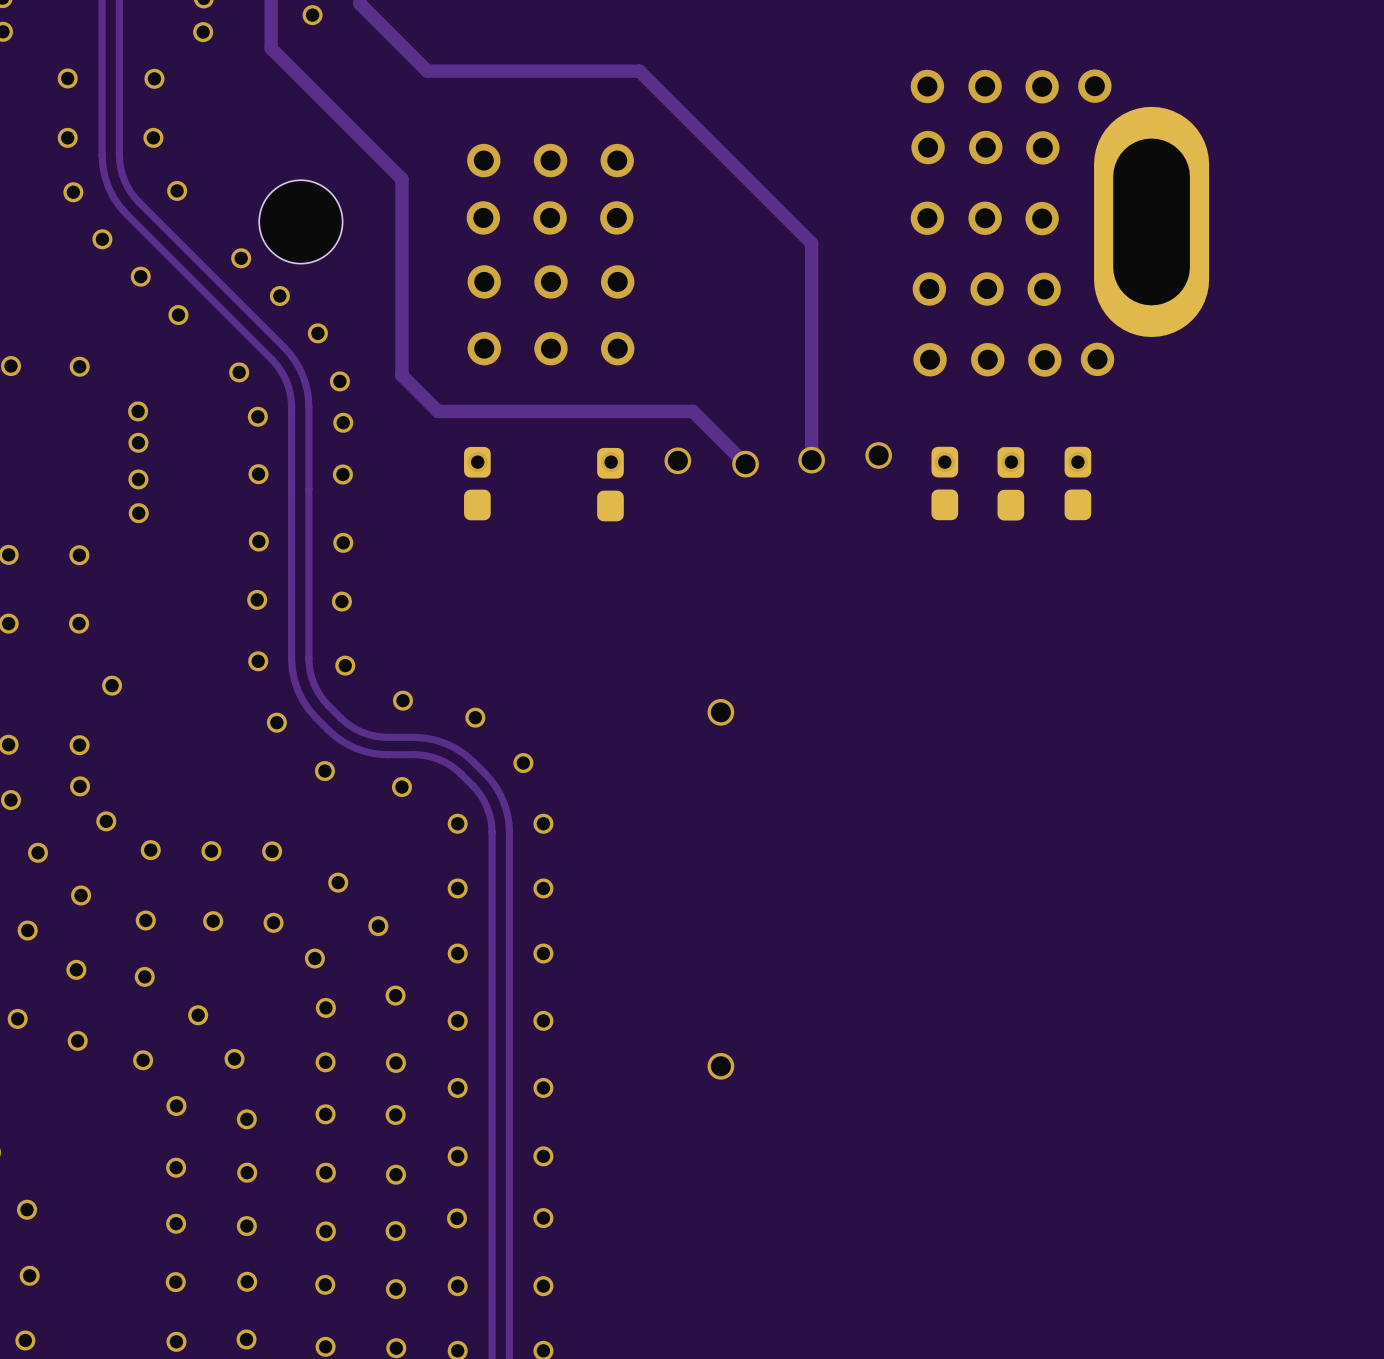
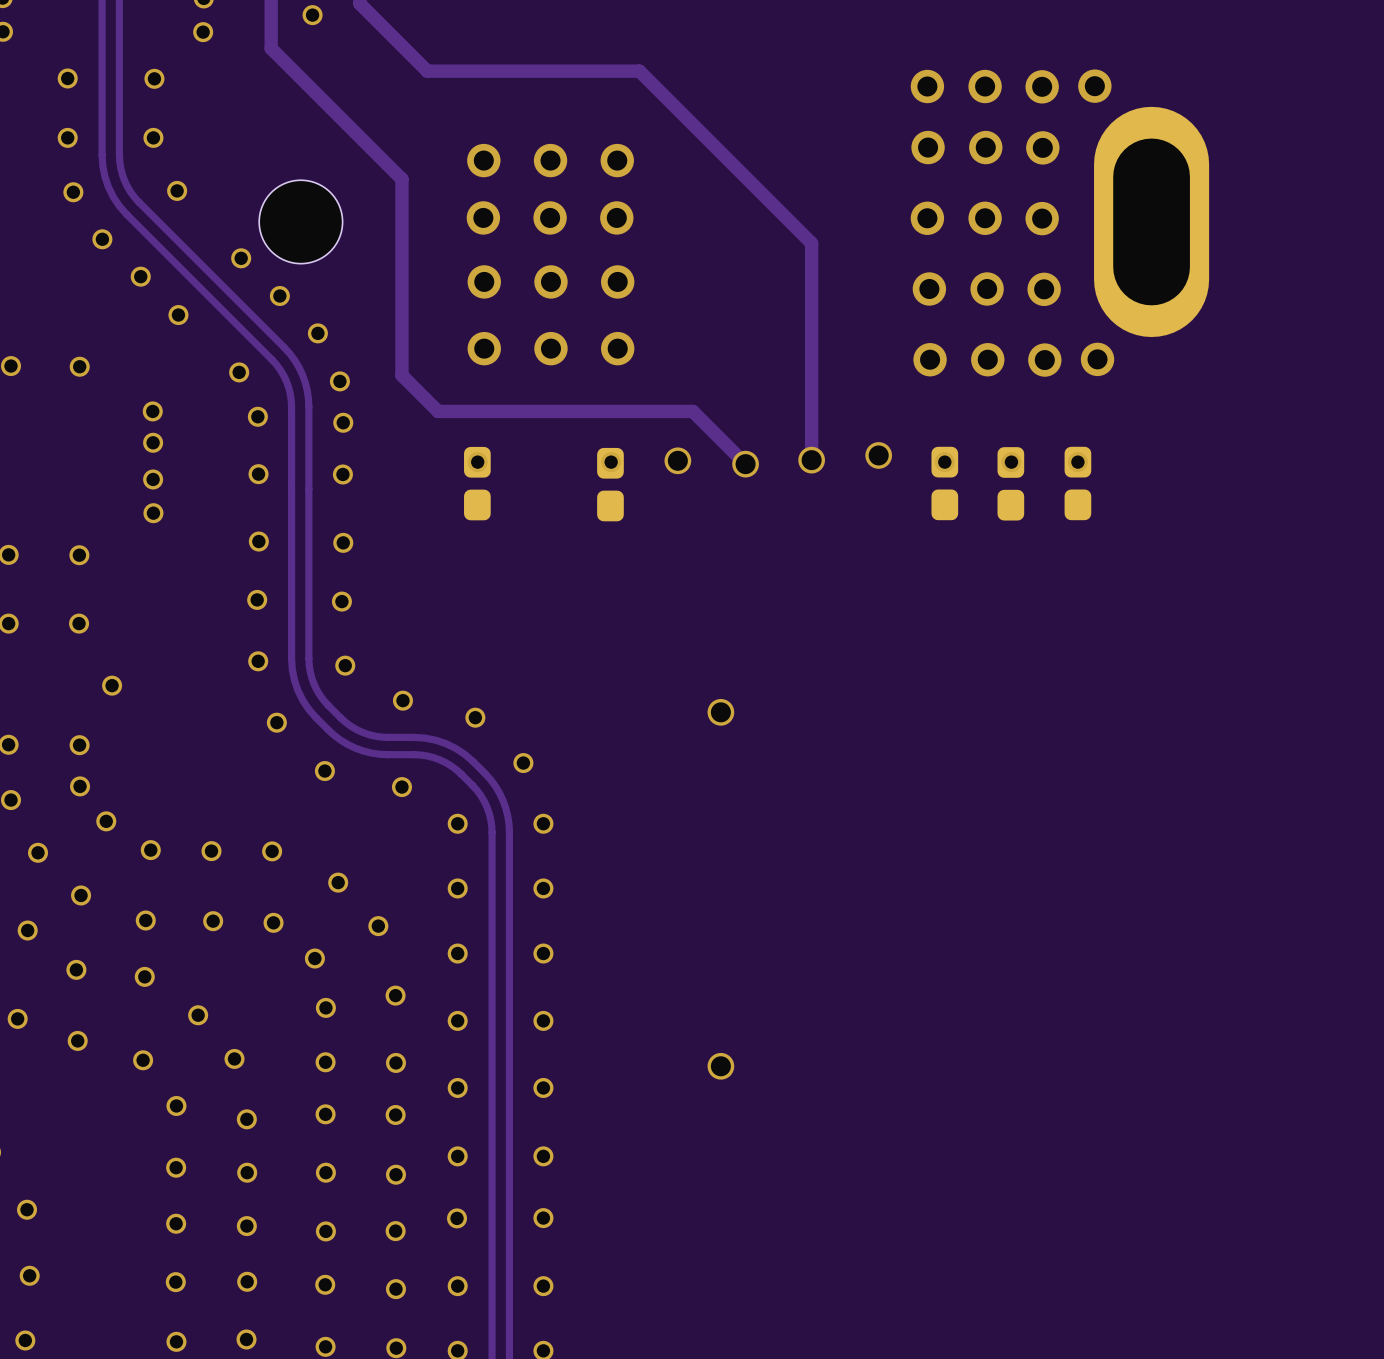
via position: (138, 411) -> (152, 411)
via position: (138, 442) -> (153, 442)
via position: (138, 479) -> (153, 479)
via position: (138, 513) -> (153, 513)

